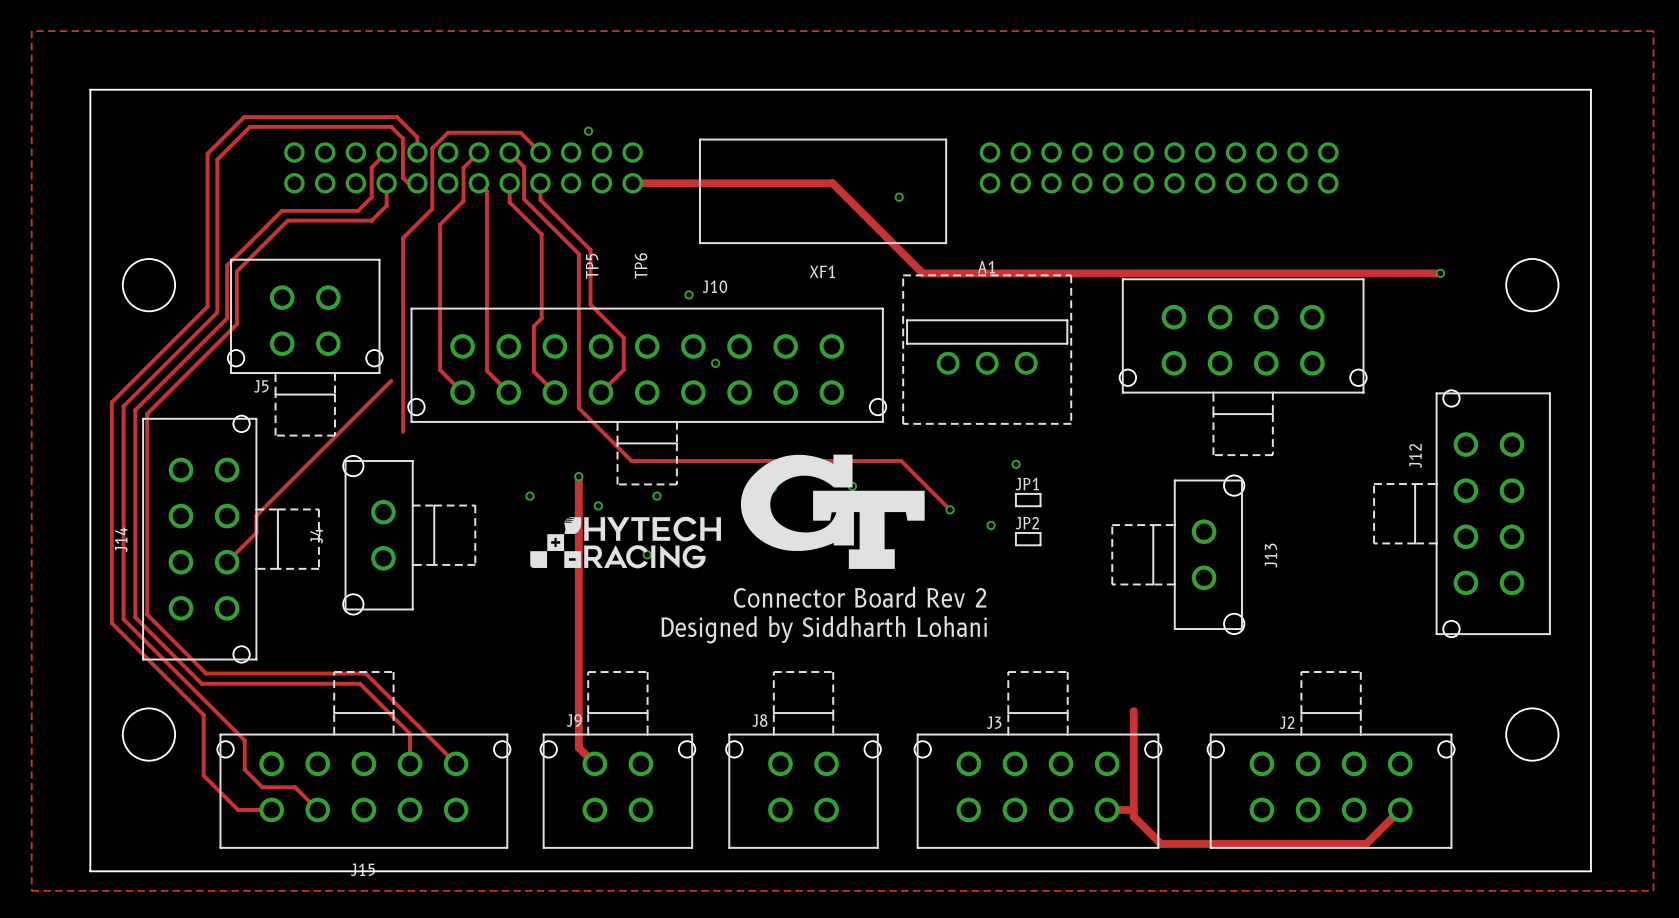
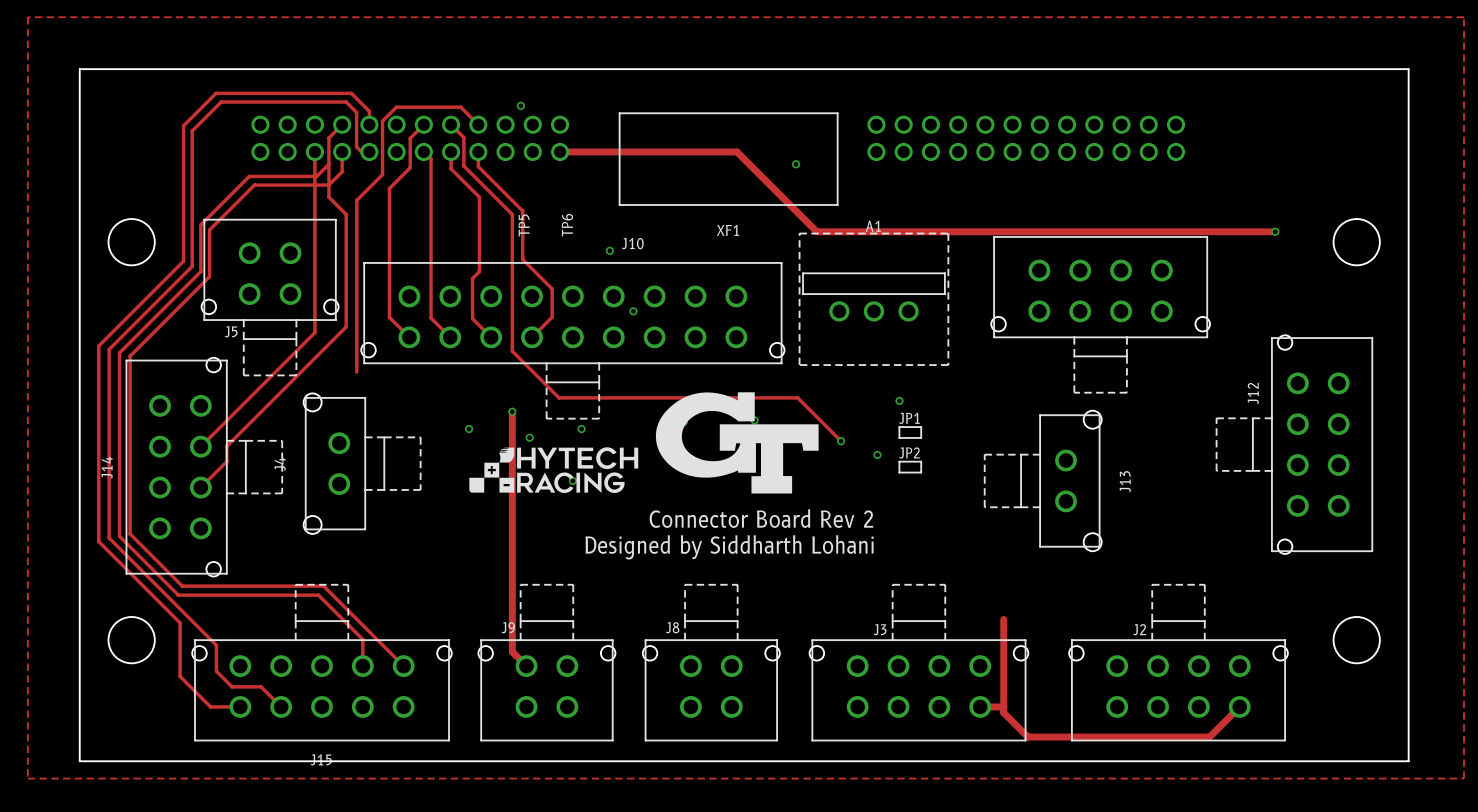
track: none -> (314, 151) (314, 332) (200, 446)
track: none -> (328, 164) (328, 197) (346, 214) (346, 326)

